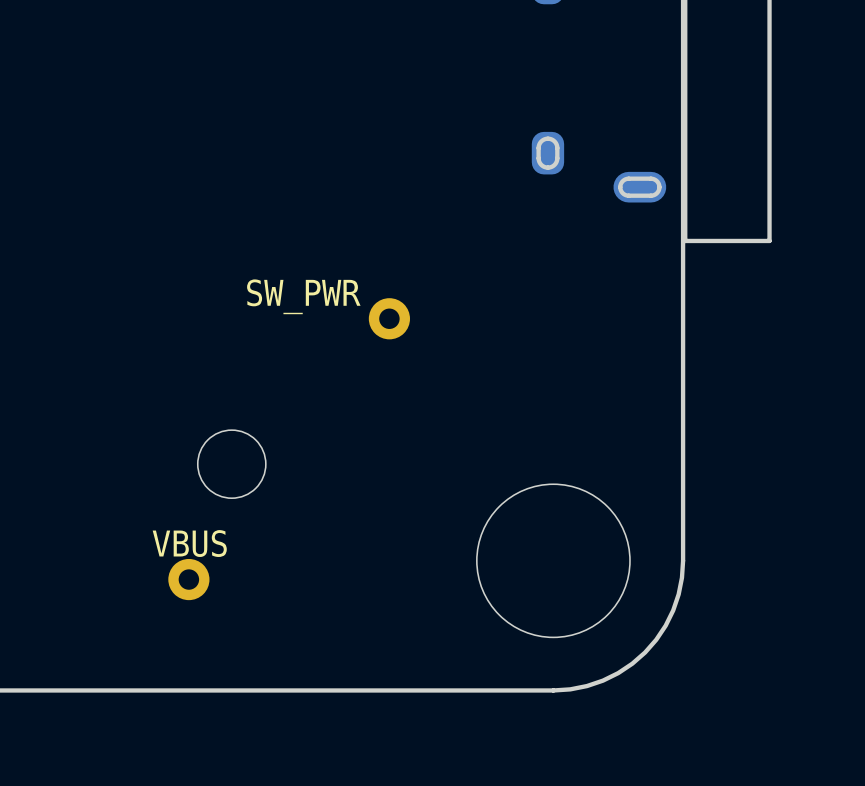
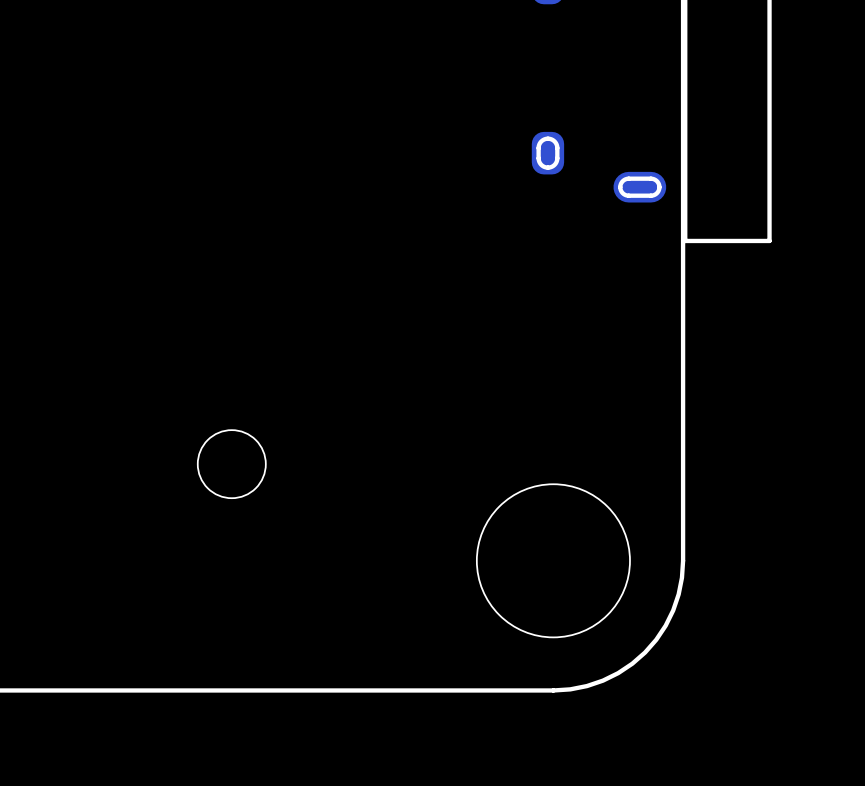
text: SW_PWR (303, 296) -> none
part: (389, 318) -> none
text: VBUS (189, 543) -> none
part: (188, 579) -> none

